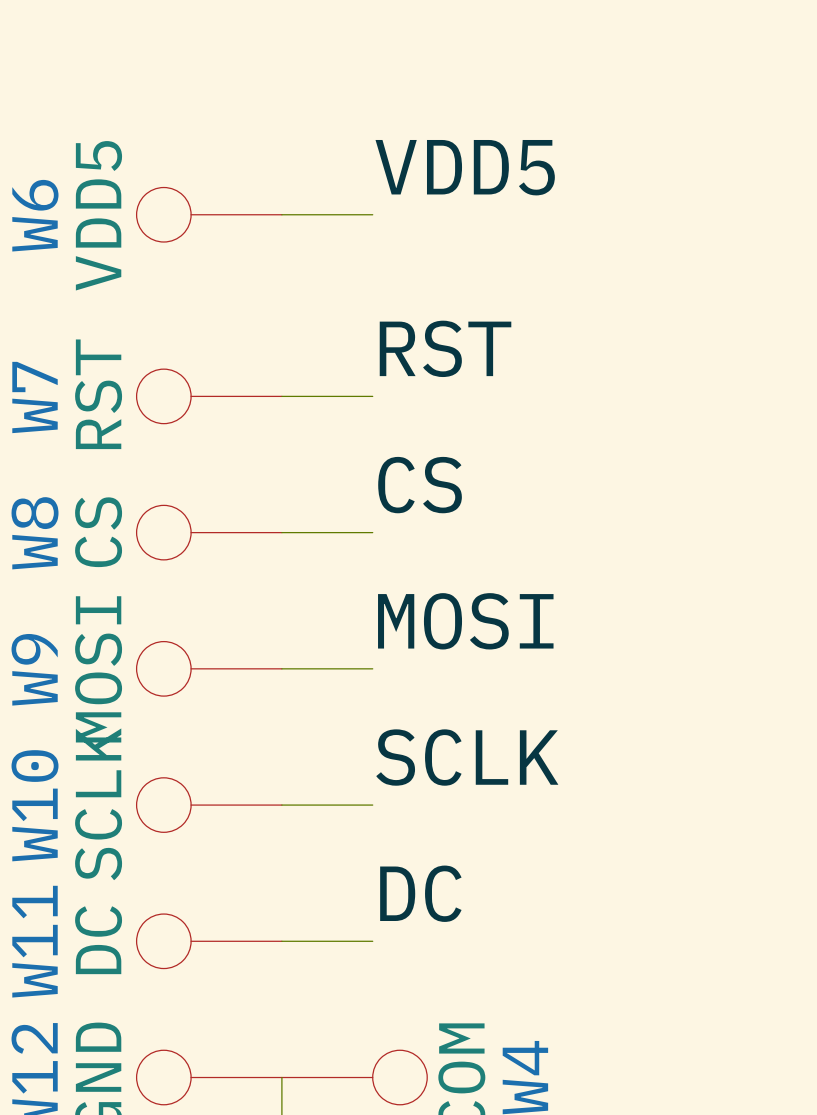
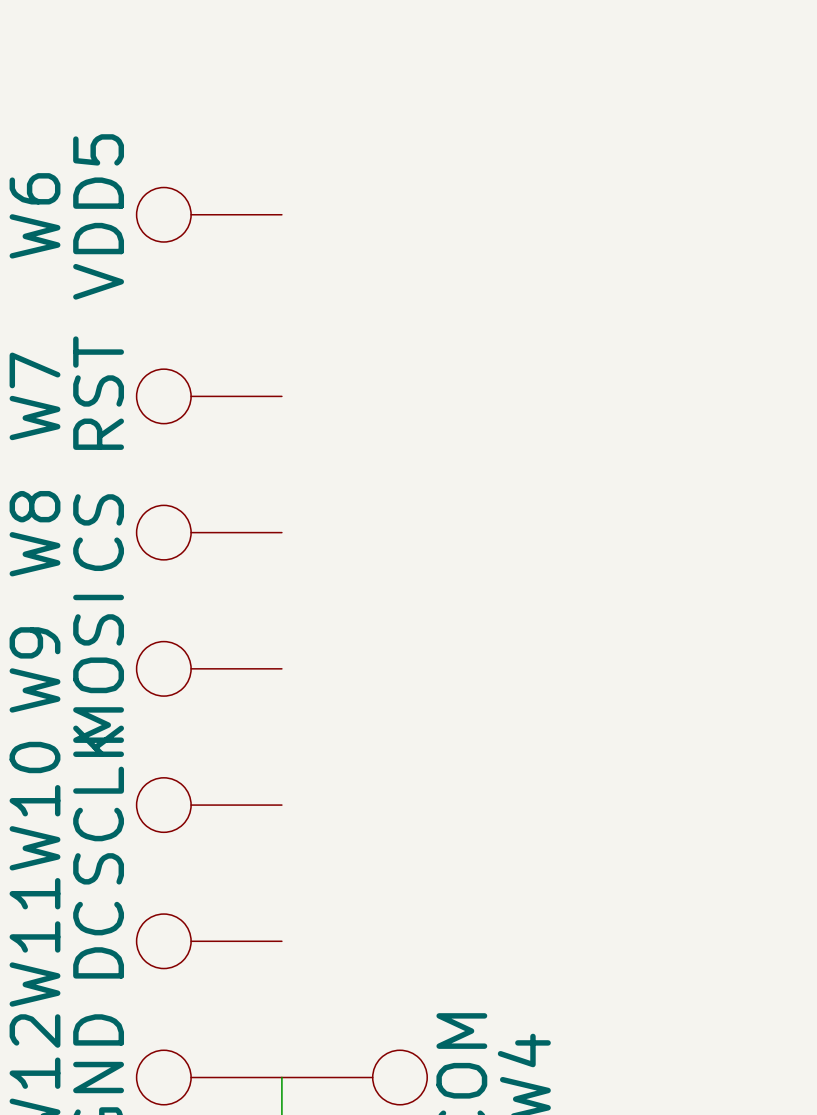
label: VDD5 (465, 167) -> none
wire: (281, 214) (372, 214) -> none
label: RST (445, 348) -> none
wire: (281, 396) (372, 396) -> none
label: CS (420, 485) -> none
wire: (281, 532) (372, 532) -> none
label: MOSI (465, 621) -> none
wire: (281, 668) (372, 668) -> none
label: SCLK (467, 757) -> none
wire: (281, 805) (372, 805) -> none
label: DC (420, 893) -> none
wire: (281, 941) (372, 941) -> none

